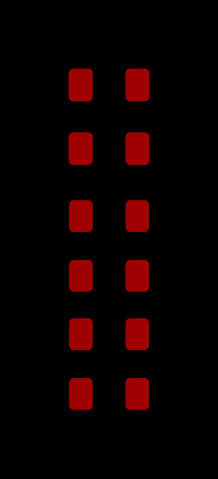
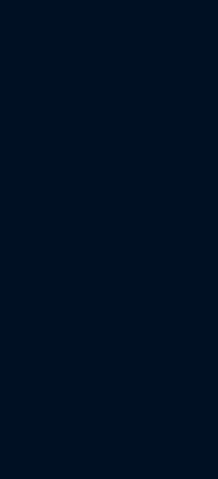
part: (109, 85) -> none
part: (109, 148) -> none
part: (109, 216) -> none
part: (109, 275) -> none
part: (109, 334) -> none
part: (109, 393) -> none

